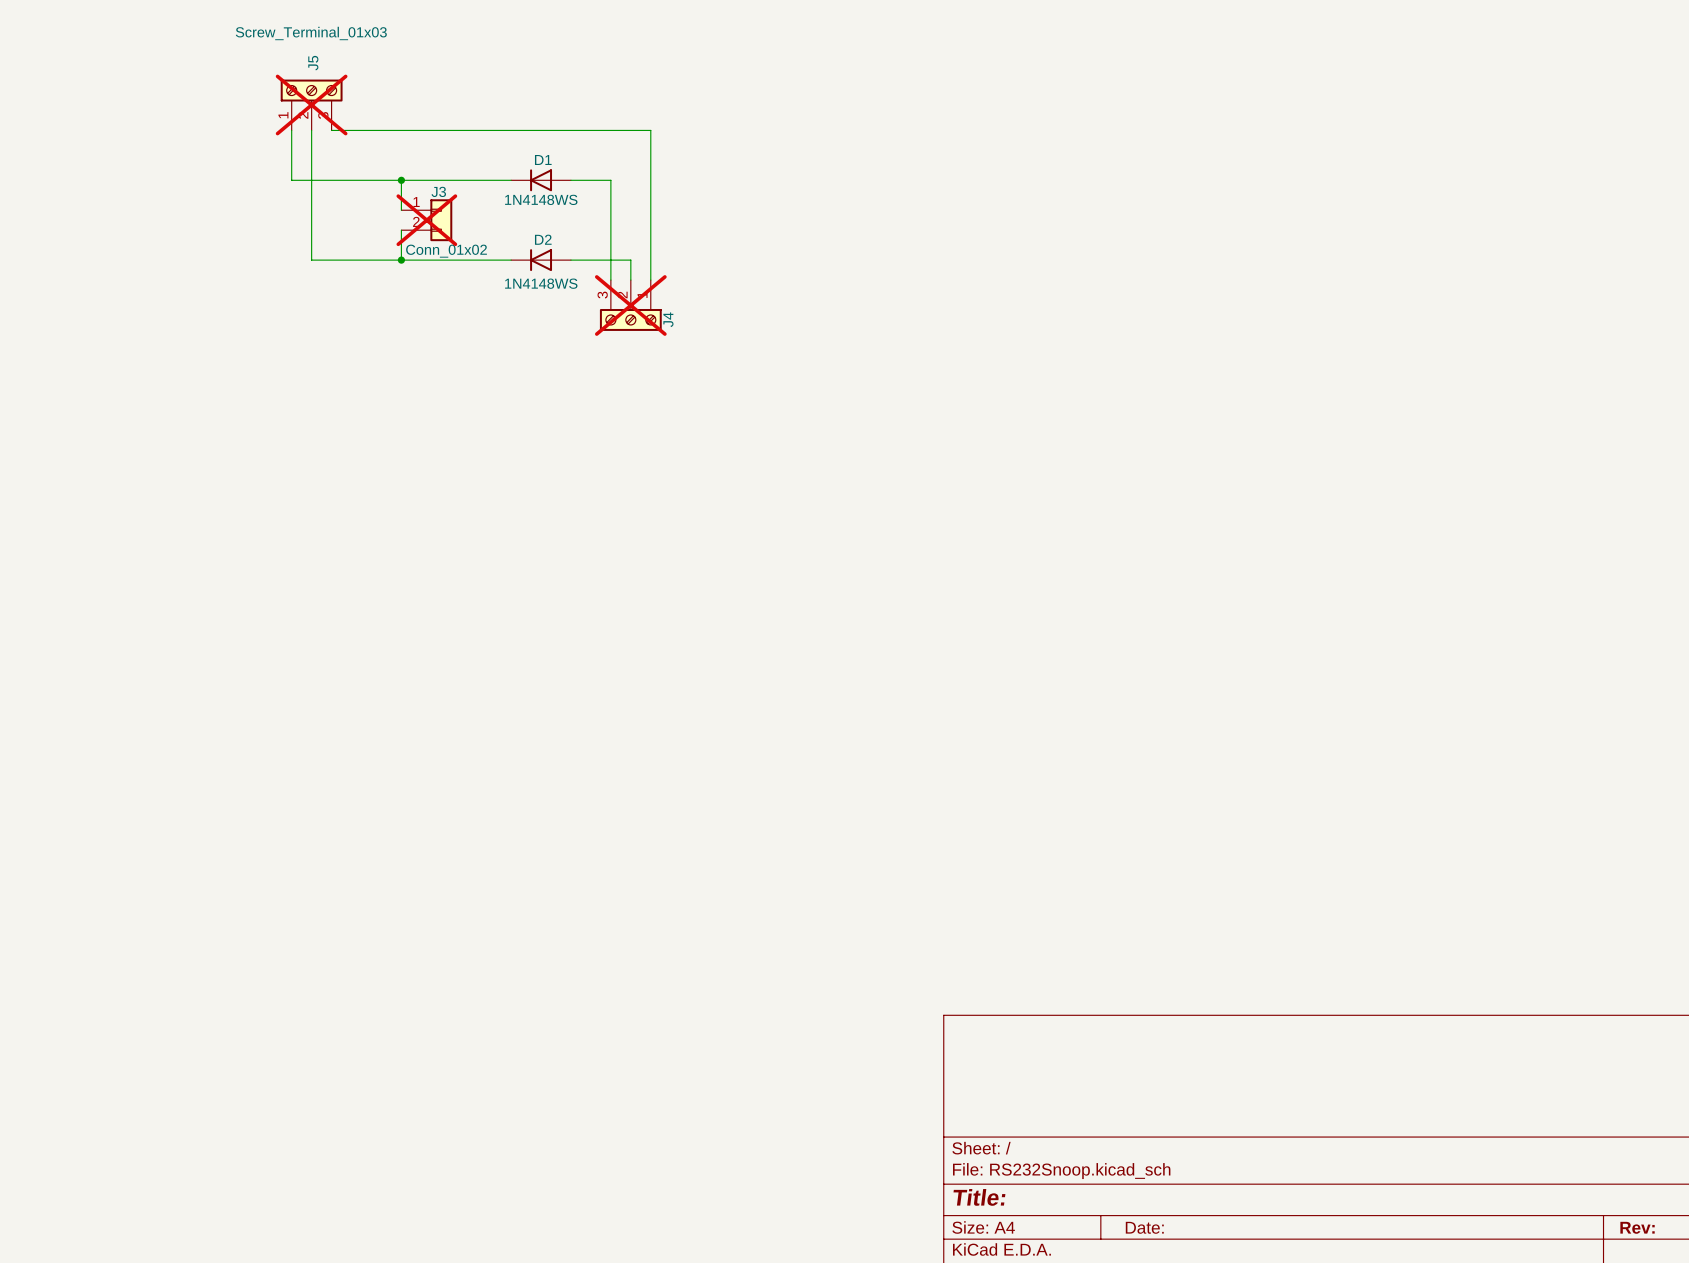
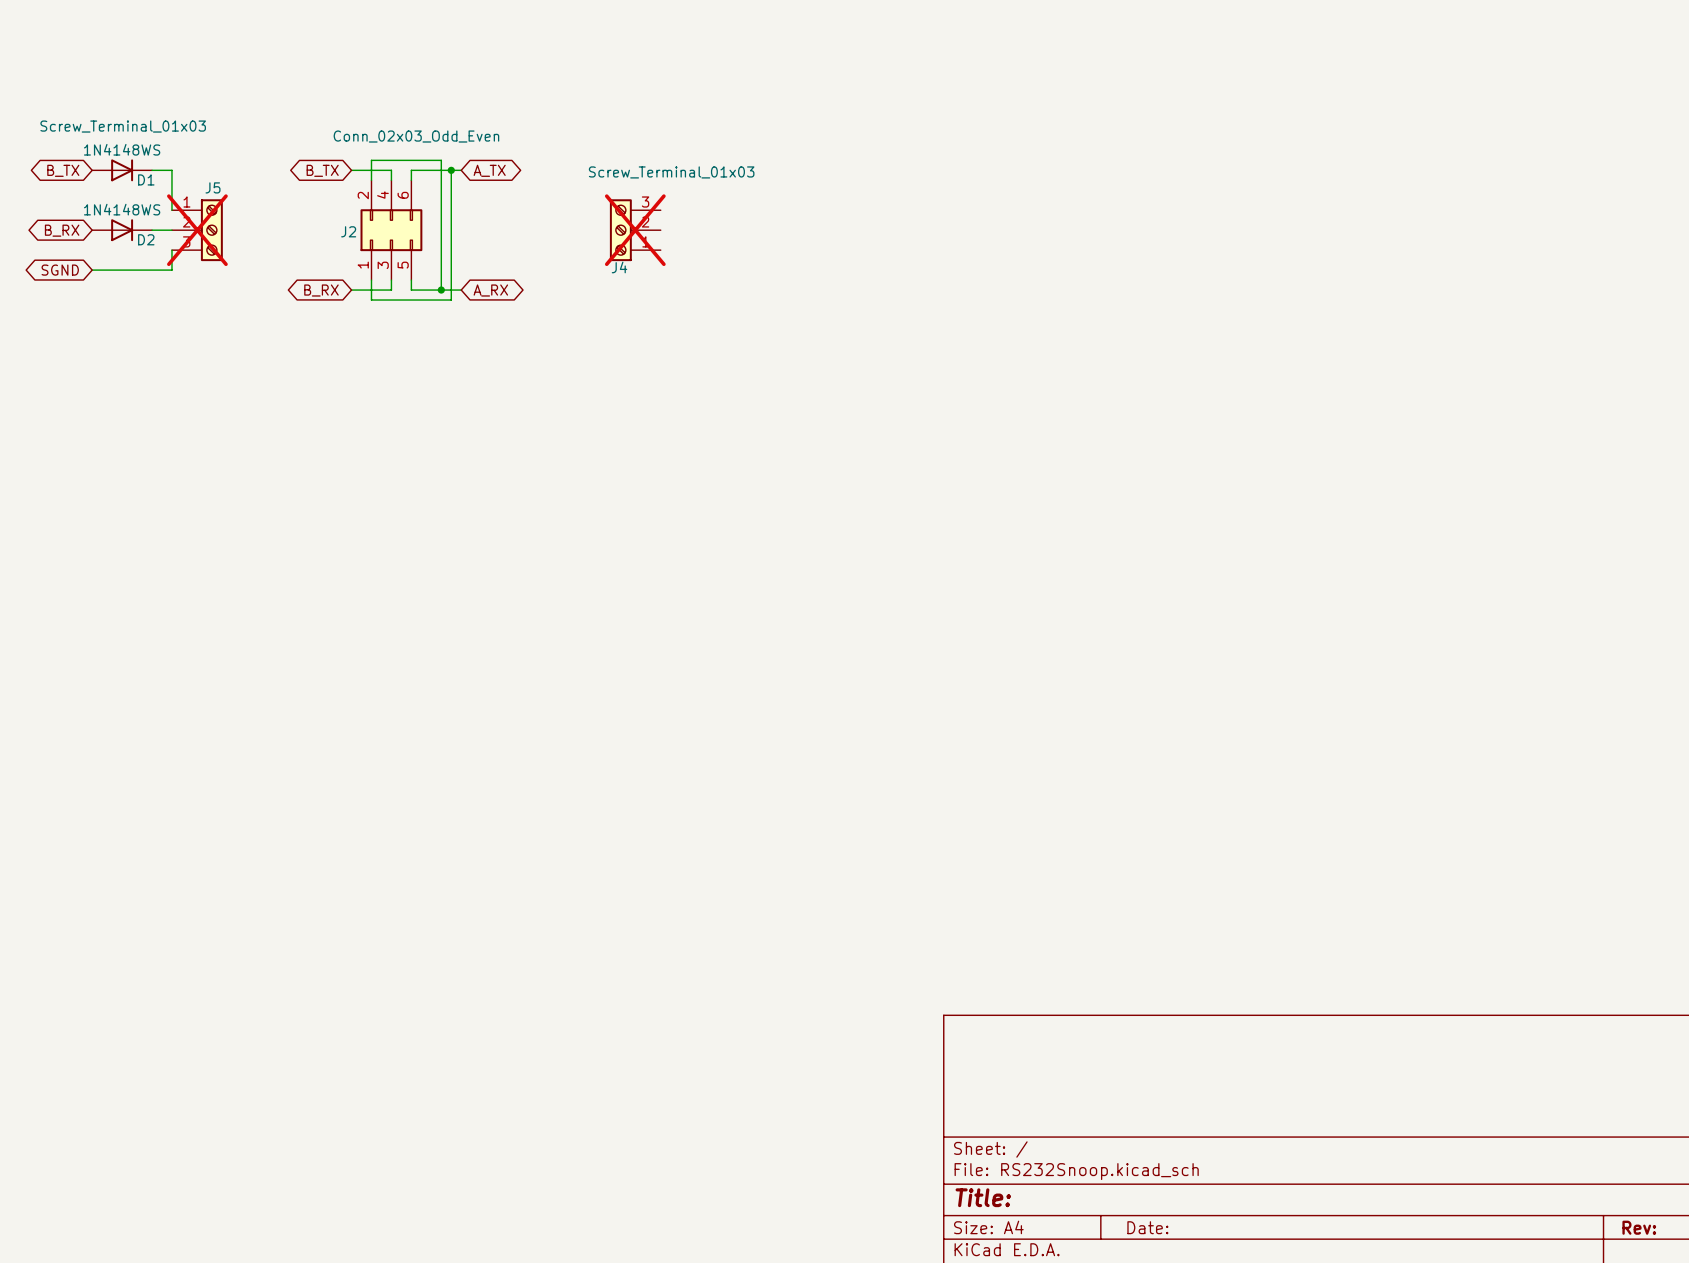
J5 value position: Screw_Terminal_01x03 (311, 33) -> Screw_Terminal_01x03 (123, 126)
J5 name position: J5 (313, 63) -> J5 (213, 187)
J5 rotation: 0° (311, 90) -> 90° clockwise (211, 230)
J5 position: (311, 105) -> (197, 230)
wire: (291, 130) (291, 180) (511, 180) -> none
wire: (311, 130) (311, 260) (511, 260) -> none
wire: (331, 130) (650, 130) (650, 280) -> none
D1 name position: D1 (543, 159) -> D1 (146, 179)
wire: none -> (152, 170) (171, 170) (171, 210)
wire: none -> (351, 170) (391, 170) (391, 180)
wire: none -> (451, 170) (451, 300) (371, 300) (371, 280)
junction: none -> (451, 170)
wire: none -> (461, 170) (411, 170) (411, 180)
global label: none -> B_TX (63, 170)
global label: none -> B_TX (322, 170)
global label: none -> A_TX (489, 170)
J4 value: none -> Screw_Terminal_01x03 (671, 172)
wire: none -> (371, 180) (371, 160) (441, 160) (441, 290)
wire: (401, 180) (401, 210) -> none
junction: (401, 180) -> none
D1 rotation: 0° (541, 180) -> 180° (122, 170)
D1 position: (541, 180) -> (122, 170)
wire: (570, 180) (610, 180) (610, 280) -> none
J3: Conn_01x02 (426, 220) -> none
wire: none -> (152, 230) (171, 230)
J2: none -> Conn_02x03_Odd_Even (391, 230)
global label: none -> B_RX (62, 230)
D2 name position: D2 (543, 239) -> D2 (146, 239)
wire: none -> (171, 250) (171, 270) (92, 270)
junction: (401, 260) -> none
D2 rotation: 0° (541, 260) -> 180° (122, 230)
D2 position: (541, 260) -> (122, 230)
wire: (570, 260) (630, 260) (630, 280) -> none
global label: none -> SGND (60, 270)
wire: none -> (391, 280) (391, 290) (351, 290)
wire: none -> (411, 280) (411, 290) (461, 290)
junction: none -> (441, 290)
global label: none -> B_RX (321, 290)
global label: none -> A_RX (490, 290)
J4 position: (630, 305) -> (635, 230)
J4 rotation: 0° (630, 319) -> 90° clockwise (620, 230)

